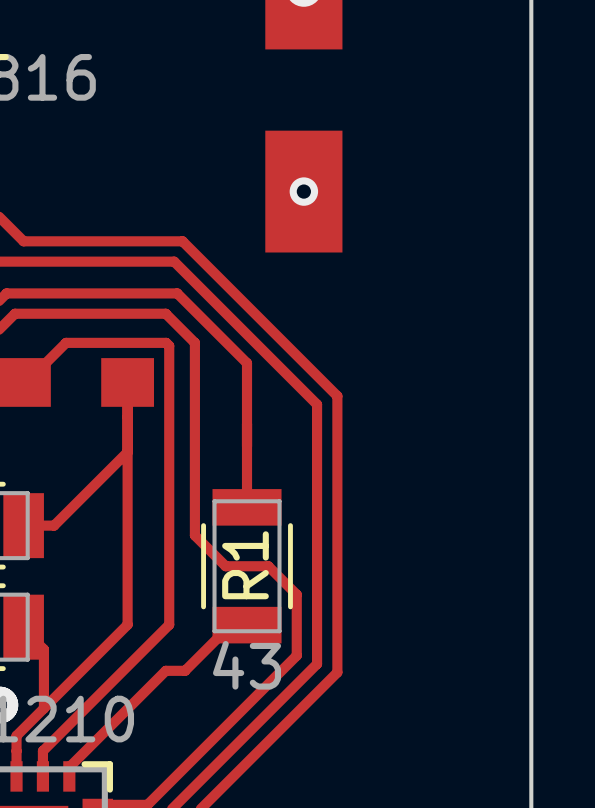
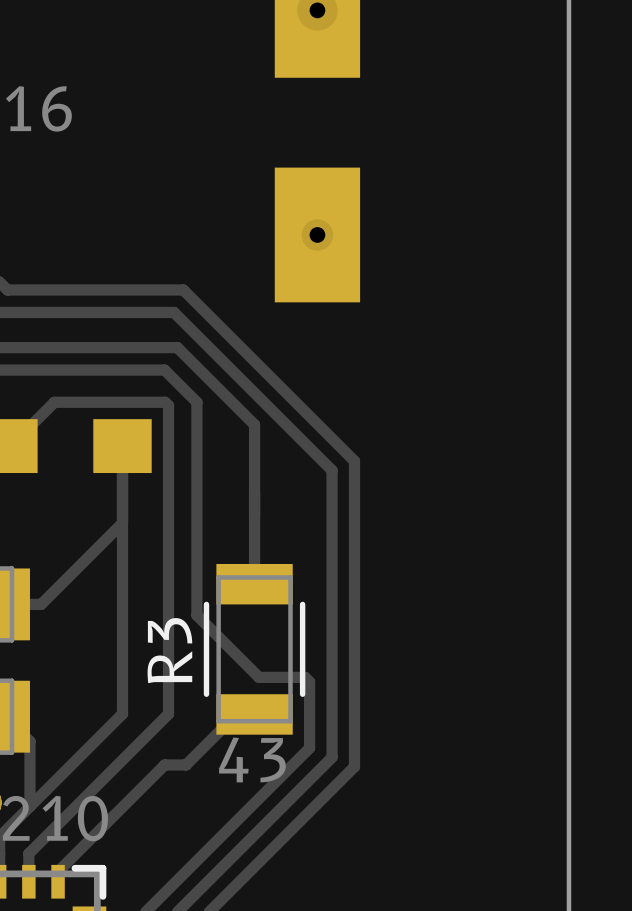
R1 name: R1 (245, 565) -> R3 (169, 650)
track: (225, 566) (268, 566) (296, 594) (296, 655) -> (230, 649) (259, 677) (305, 677) (309, 681) (309, 748)

